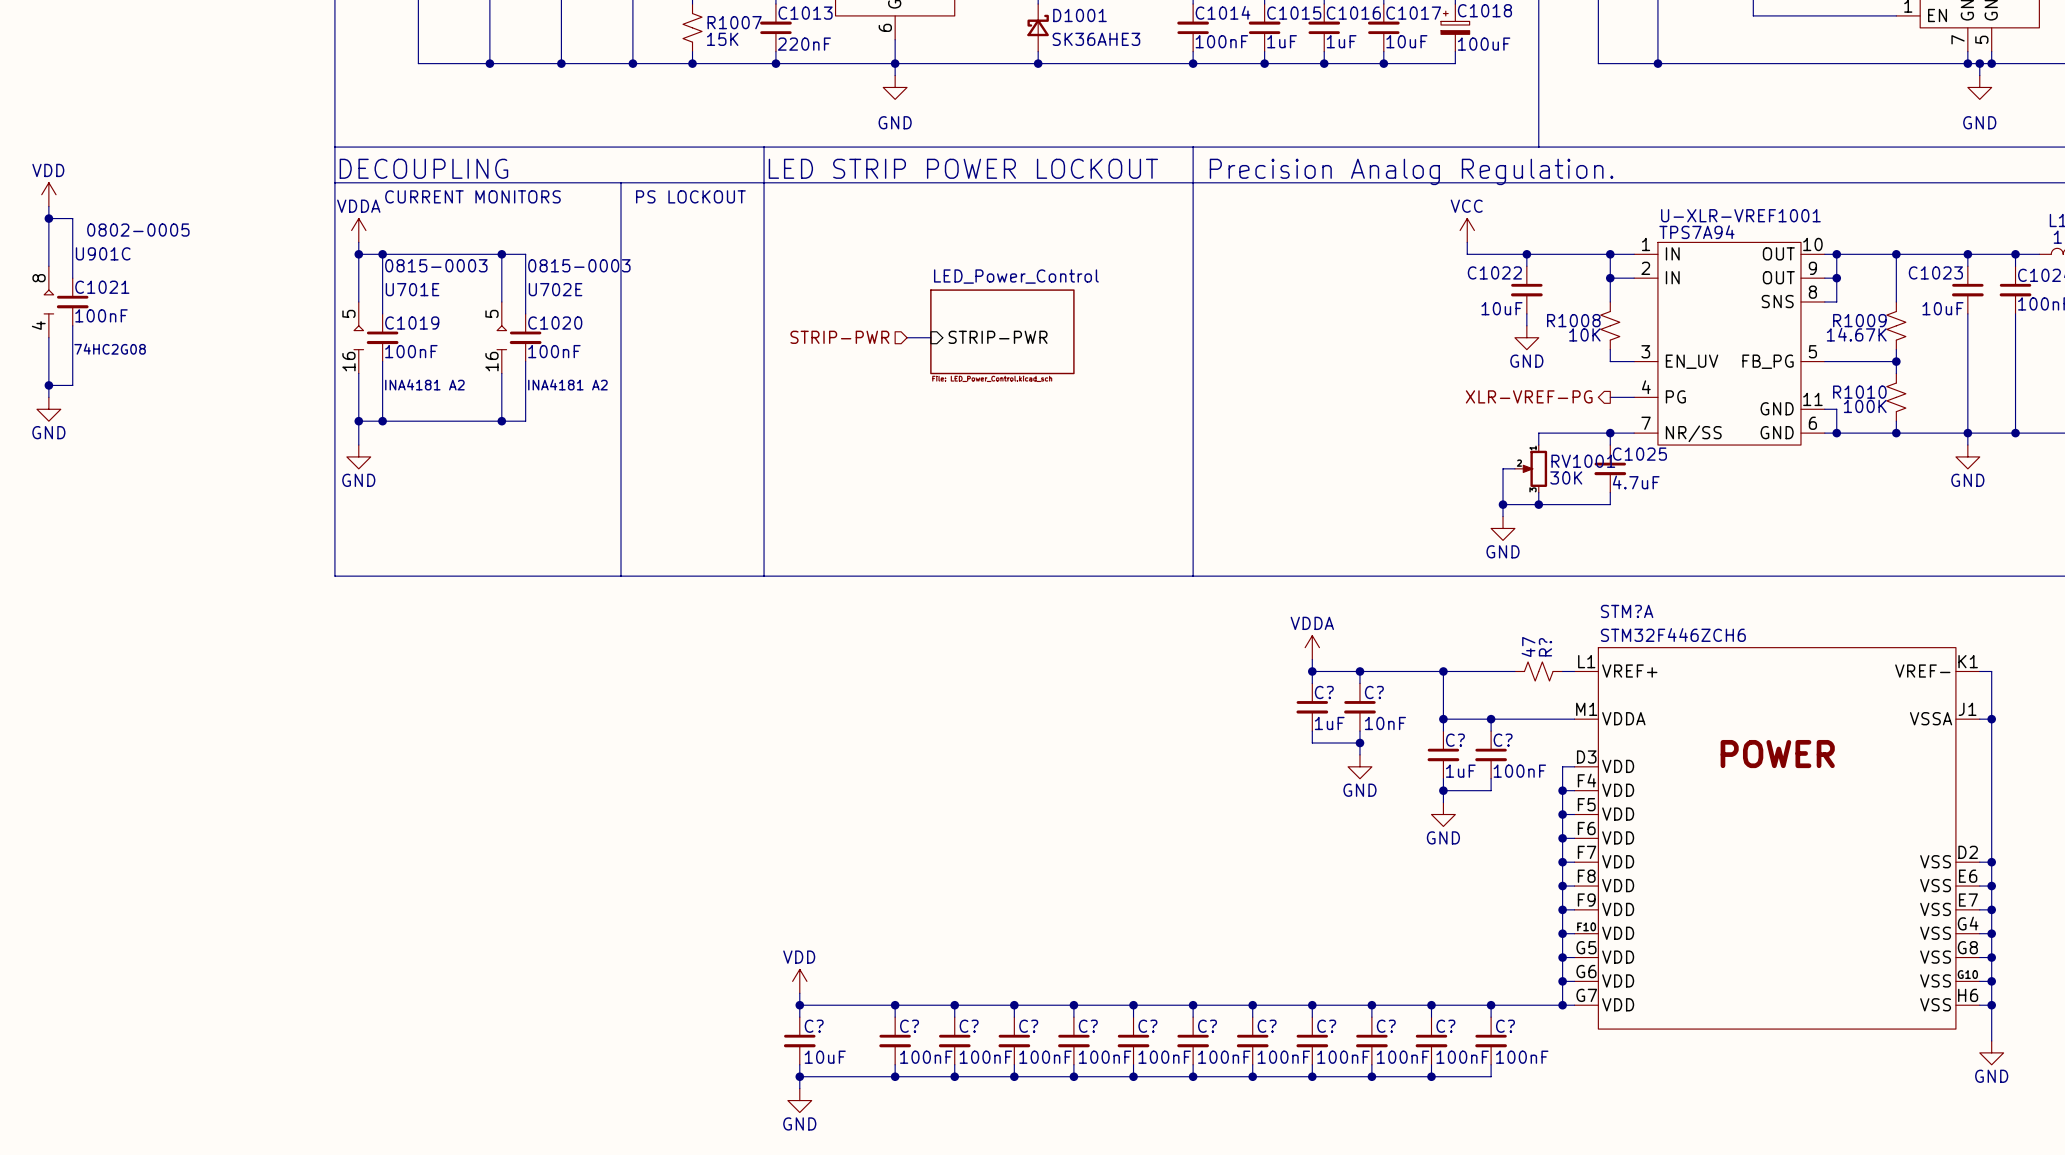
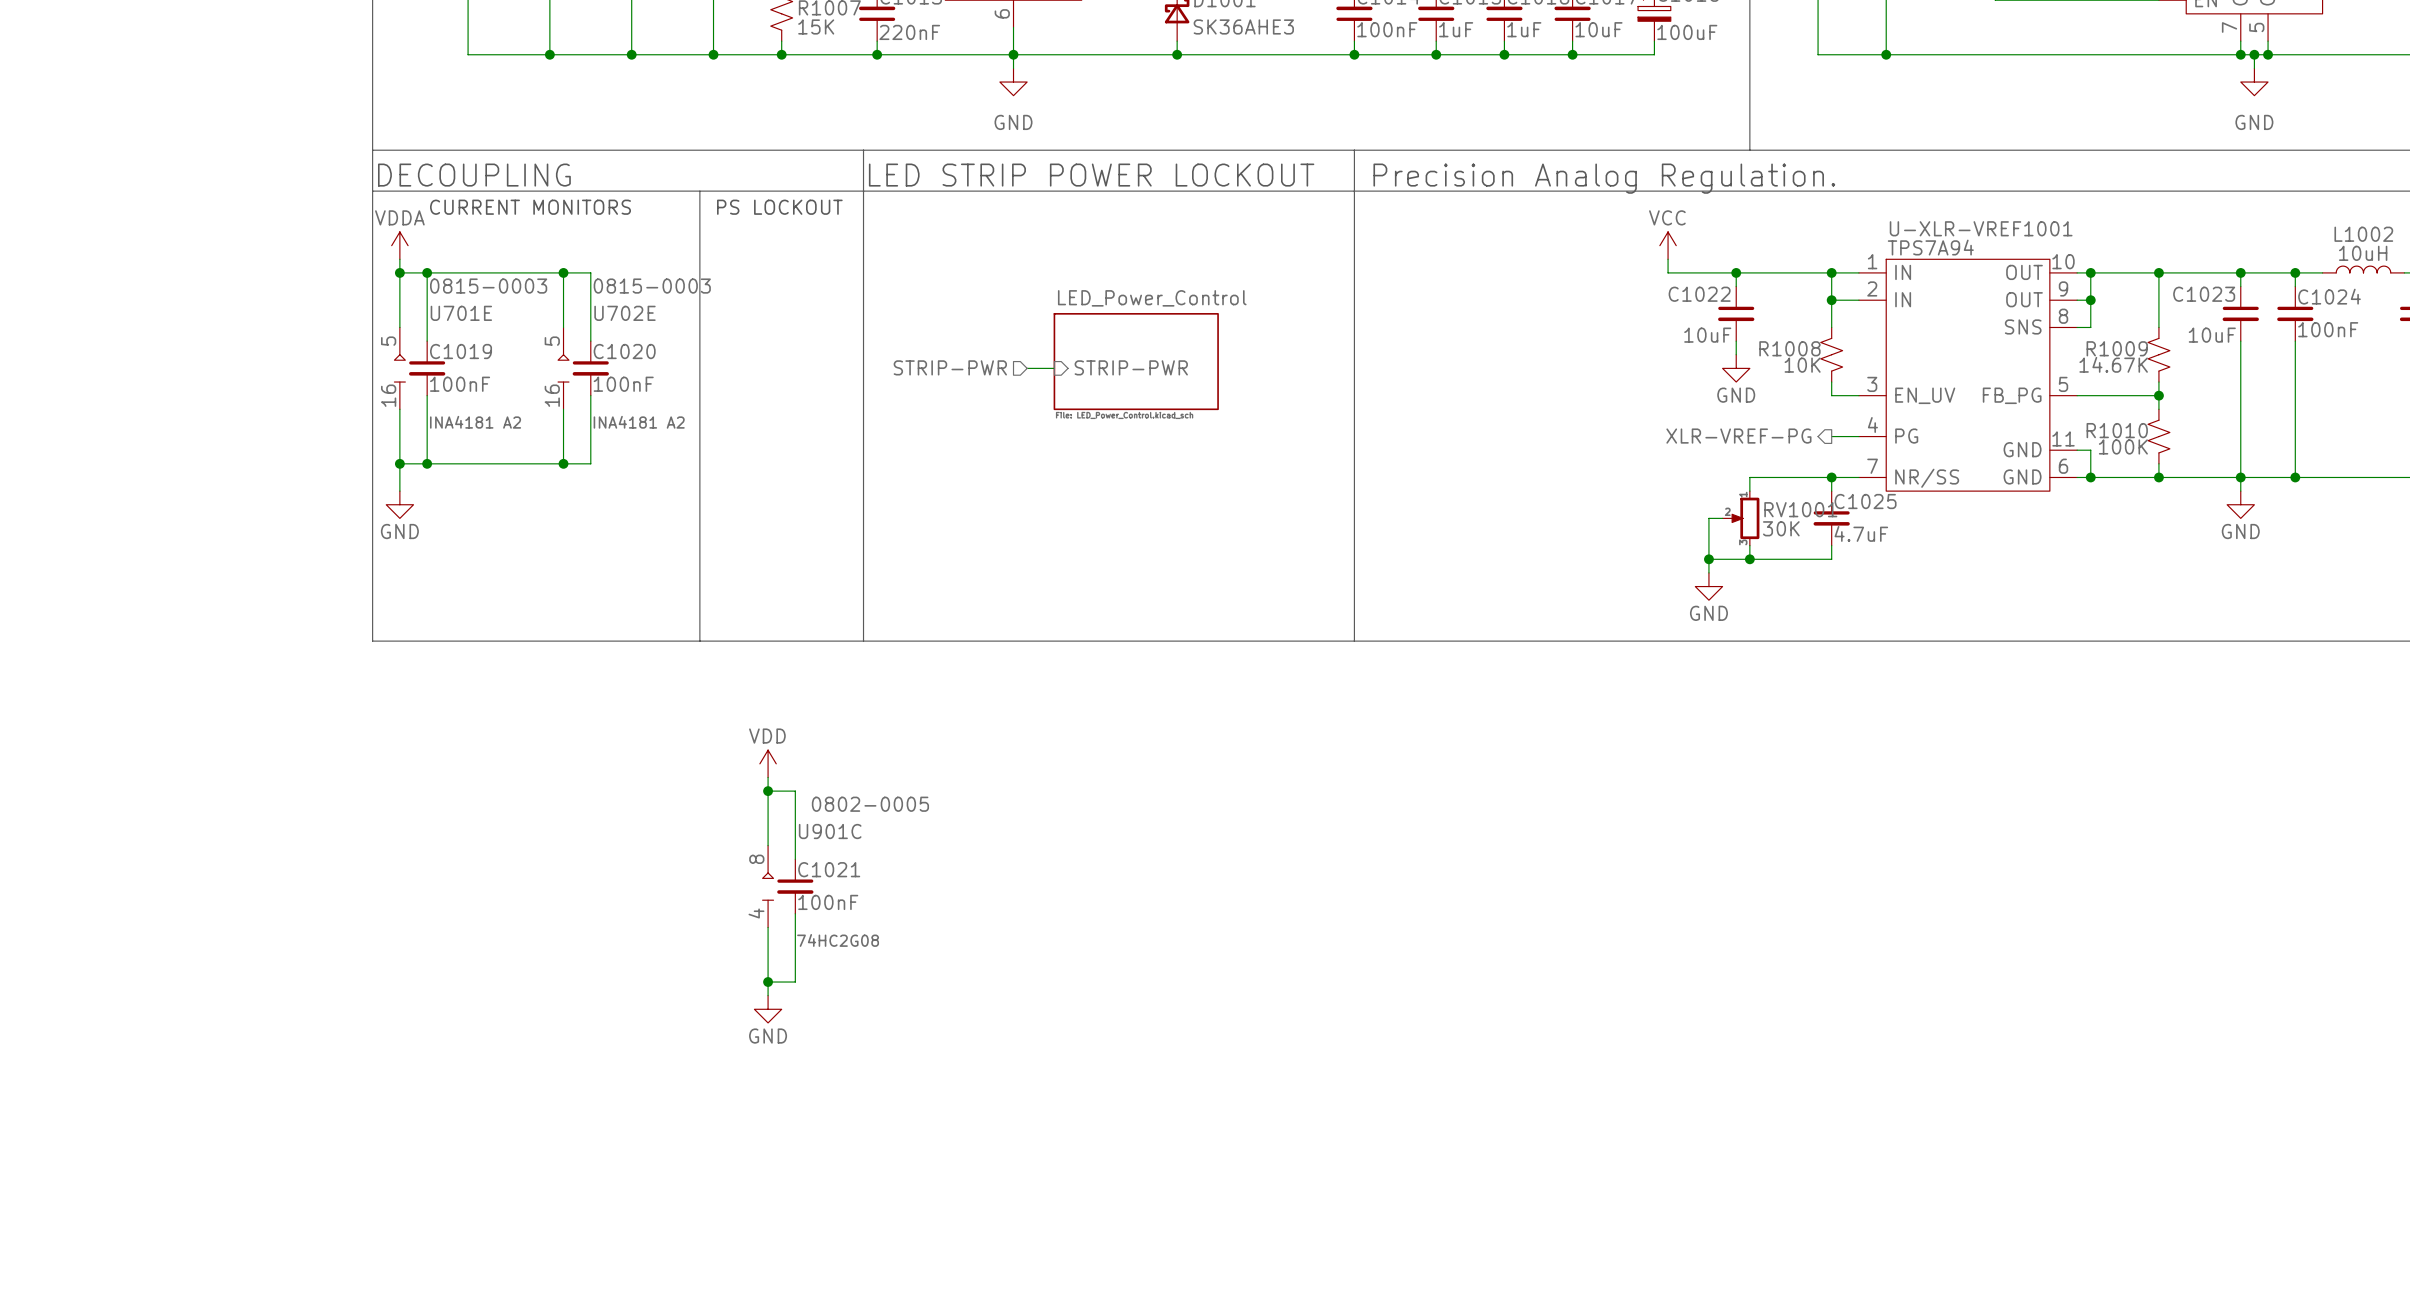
power symbol: VDD (48, 194) -> none
wire: (48, 206) (48, 266) -> none
wire: (48, 218) (72, 218) (72, 278) -> none
junction: (48, 218) -> none
U901C position: (48, 301) -> (768, 886)
C1021 position: (72, 301) -> (795, 886)
wire: (72, 325) (72, 385) (48, 385) -> none
wire: (48, 337) (48, 397) -> none
junction: (48, 385) -> none
power symbol: GND (48, 409) -> none
power symbol: VDDA (1312, 647) -> none
wire: (1312, 659) (1312, 683) -> none
wire: (1312, 671) (1514, 671) -> none
junction: (1312, 671) -> none
wire: (1359, 671) (1359, 683) -> none
junction: (1359, 671) -> none
wire: (1443, 671) (1443, 731) -> none
junction: (1443, 671) -> none
R?: 47 (1538, 671) -> none
wire: (1562, 671) (1574, 671) -> none
wire: (1979, 671) (1991, 671) (1991, 1040) -> none
power symbol: none -> VDD (768, 763)
wire: none -> (768, 777) (768, 845)
wire: none -> (768, 791) (795, 791) (795, 859)
junction: none -> (768, 791)
C?: 1uF (1312, 707) -> none
C?: 10nF (1359, 707) -> none
wire: (1443, 719) (1574, 719) -> none
junction: (1443, 719) -> none
wire: (1491, 719) (1491, 731) -> none
junction: (1491, 719) -> none
wire: (1979, 719) (1991, 719) -> none
junction: (1991, 719) -> none
wire: (1312, 731) (1312, 743) (1359, 743) -> none
wire: (1359, 731) (1359, 754) -> none
junction: (1359, 743) -> none
C?: 1uF (1443, 754) -> none
C?: 100nF (1491, 754) -> none
power symbol: GND (1359, 766) -> none
wire: (1574, 766) (1562, 766) (1562, 1005) -> none
wire: (1443, 778) (1443, 802) -> none
wire: (1491, 778) (1491, 790) (1443, 790) -> none
junction: (1443, 790) -> none
wire: (1562, 790) (1574, 790) -> none
junction: (1562, 790) -> none
wire: none -> (795, 913) (795, 982) (768, 982)
power symbol: GND (1443, 814) -> none
wire: (1562, 814) (1574, 814) -> none
junction: (1562, 814) -> none
wire: none -> (768, 927) (768, 995)
wire: (1562, 838) (1574, 838) -> none
junction: (1562, 838) -> none
STM?A: STM32F446ZCH6 (1777, 838) -> none
wire: (1562, 862) (1574, 862) -> none
junction: (1562, 862) -> none
wire: (1979, 862) (1991, 862) -> none
junction: (1991, 862) -> none
junction: none -> (768, 982)
wire: (1562, 886) (1574, 886) -> none
junction: (1562, 886) -> none
wire: (1979, 886) (1991, 886) -> none
junction: (1991, 886) -> none
power symbol: none -> GND (768, 1009)
wire: (1562, 909) (1574, 909) -> none
junction: (1562, 909) -> none
wire: (1979, 909) (1991, 909) -> none
junction: (1991, 909) -> none
wire: (1562, 933) (1574, 933) -> none
junction: (1562, 933) -> none
wire: (1979, 933) (1991, 933) -> none
junction: (1991, 933) -> none
wire: (1562, 957) (1574, 957) -> none
junction: (1562, 957) -> none
wire: (1979, 957) (1991, 957) -> none
junction: (1991, 957) -> none
power symbol: VDD (799, 981) -> none
wire: (1562, 981) (1574, 981) -> none
junction: (1562, 981) -> none
wire: (1979, 981) (1991, 981) -> none
junction: (1991, 981) -> none
wire: (799, 993) (799, 1017) -> none
wire: (799, 1005) (1574, 1005) -> none
junction: (799, 1005) -> none
wire: (895, 1005) (895, 1017) -> none
junction: (895, 1005) -> none
wire: (954, 1005) (954, 1017) -> none
junction: (954, 1005) -> none
wire: (1014, 1005) (1014, 1017) -> none
junction: (1014, 1005) -> none
wire: (1073, 1005) (1073, 1017) -> none
junction: (1073, 1005) -> none
wire: (1133, 1005) (1133, 1017) -> none
junction: (1133, 1005) -> none
wire: (1193, 1005) (1193, 1017) -> none
junction: (1193, 1005) -> none
wire: (1252, 1005) (1252, 1017) -> none
junction: (1252, 1005) -> none
wire: (1312, 1005) (1312, 1017) -> none
junction: (1312, 1005) -> none
wire: (1371, 1005) (1371, 1017) -> none
junction: (1371, 1005) -> none
wire: (1431, 1005) (1431, 1017) -> none
junction: (1431, 1005) -> none
wire: (1491, 1005) (1491, 1017) -> none
junction: (1491, 1005) -> none
junction: (1562, 1005) -> none
wire: (1979, 1005) (1991, 1005) -> none
junction: (1991, 1005) -> none
C?: 10uF (799, 1040) -> none
C?: 100nF (895, 1040) -> none
C?: 100nF (954, 1040) -> none
C?: 100nF (1014, 1040) -> none
C?: 100nF (1073, 1040) -> none
C?: 100nF (1133, 1040) -> none
C?: 100nF (1193, 1040) -> none
C?: 100nF (1252, 1040) -> none
C?: 100nF (1312, 1040) -> none
C?: 100nF (1371, 1040) -> none
C?: 100nF (1431, 1040) -> none
C?: 100nF (1491, 1040) -> none
power symbol: GND (1991, 1052) -> none
wire: (799, 1064) (799, 1088) -> none
wire: (895, 1064) (895, 1076) -> none
wire: (954, 1064) (954, 1076) -> none
wire: (1014, 1064) (1014, 1076) -> none
wire: (1073, 1064) (1073, 1076) -> none
wire: (1133, 1064) (1133, 1076) -> none
wire: (1193, 1064) (1193, 1076) -> none
wire: (1252, 1064) (1252, 1076) -> none
wire: (1312, 1064) (1312, 1076) -> none
wire: (1371, 1064) (1371, 1076) -> none
wire: (1431, 1064) (1431, 1076) -> none
wire: (1491, 1064) (1491, 1076) (799, 1076) -> none
junction: (799, 1076) -> none
junction: (895, 1076) -> none
junction: (954, 1076) -> none
junction: (1014, 1076) -> none
junction: (1073, 1076) -> none
junction: (1133, 1076) -> none
junction: (1193, 1076) -> none
junction: (1252, 1076) -> none
junction: (1312, 1076) -> none
junction: (1371, 1076) -> none
junction: (1431, 1076) -> none
power symbol: GND (799, 1100) -> none

